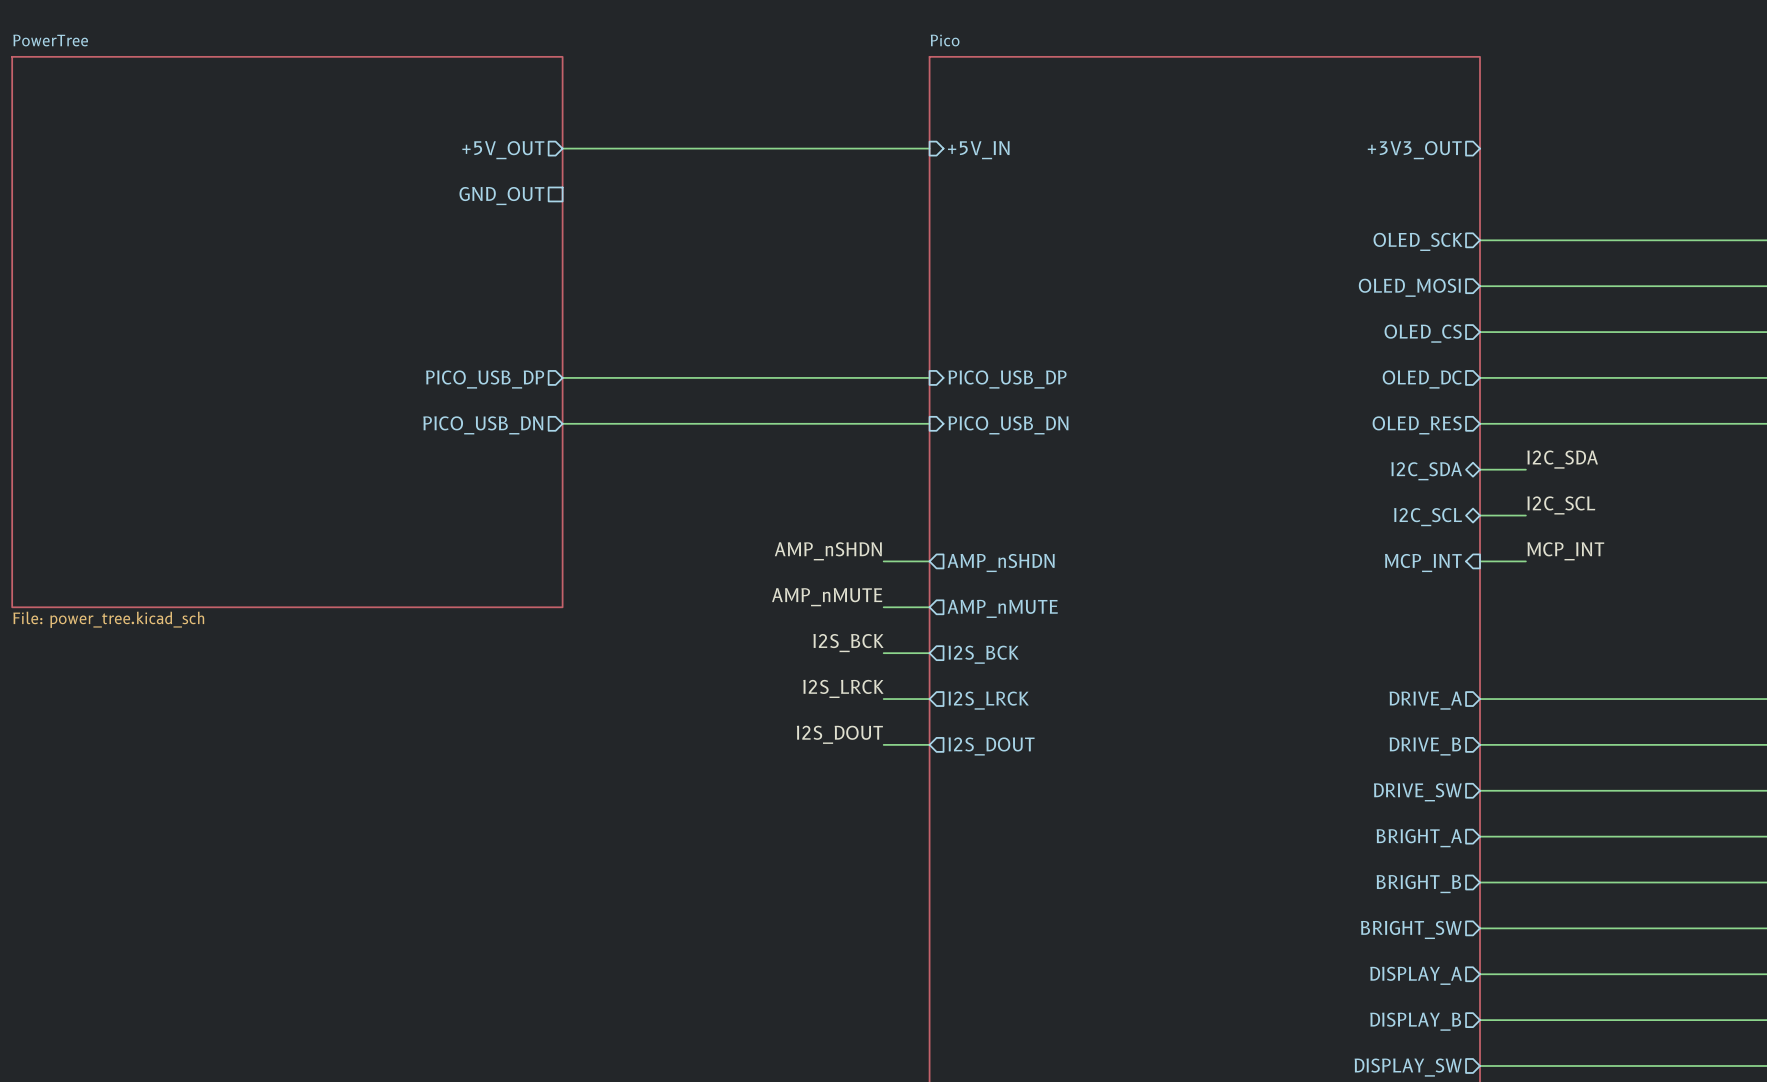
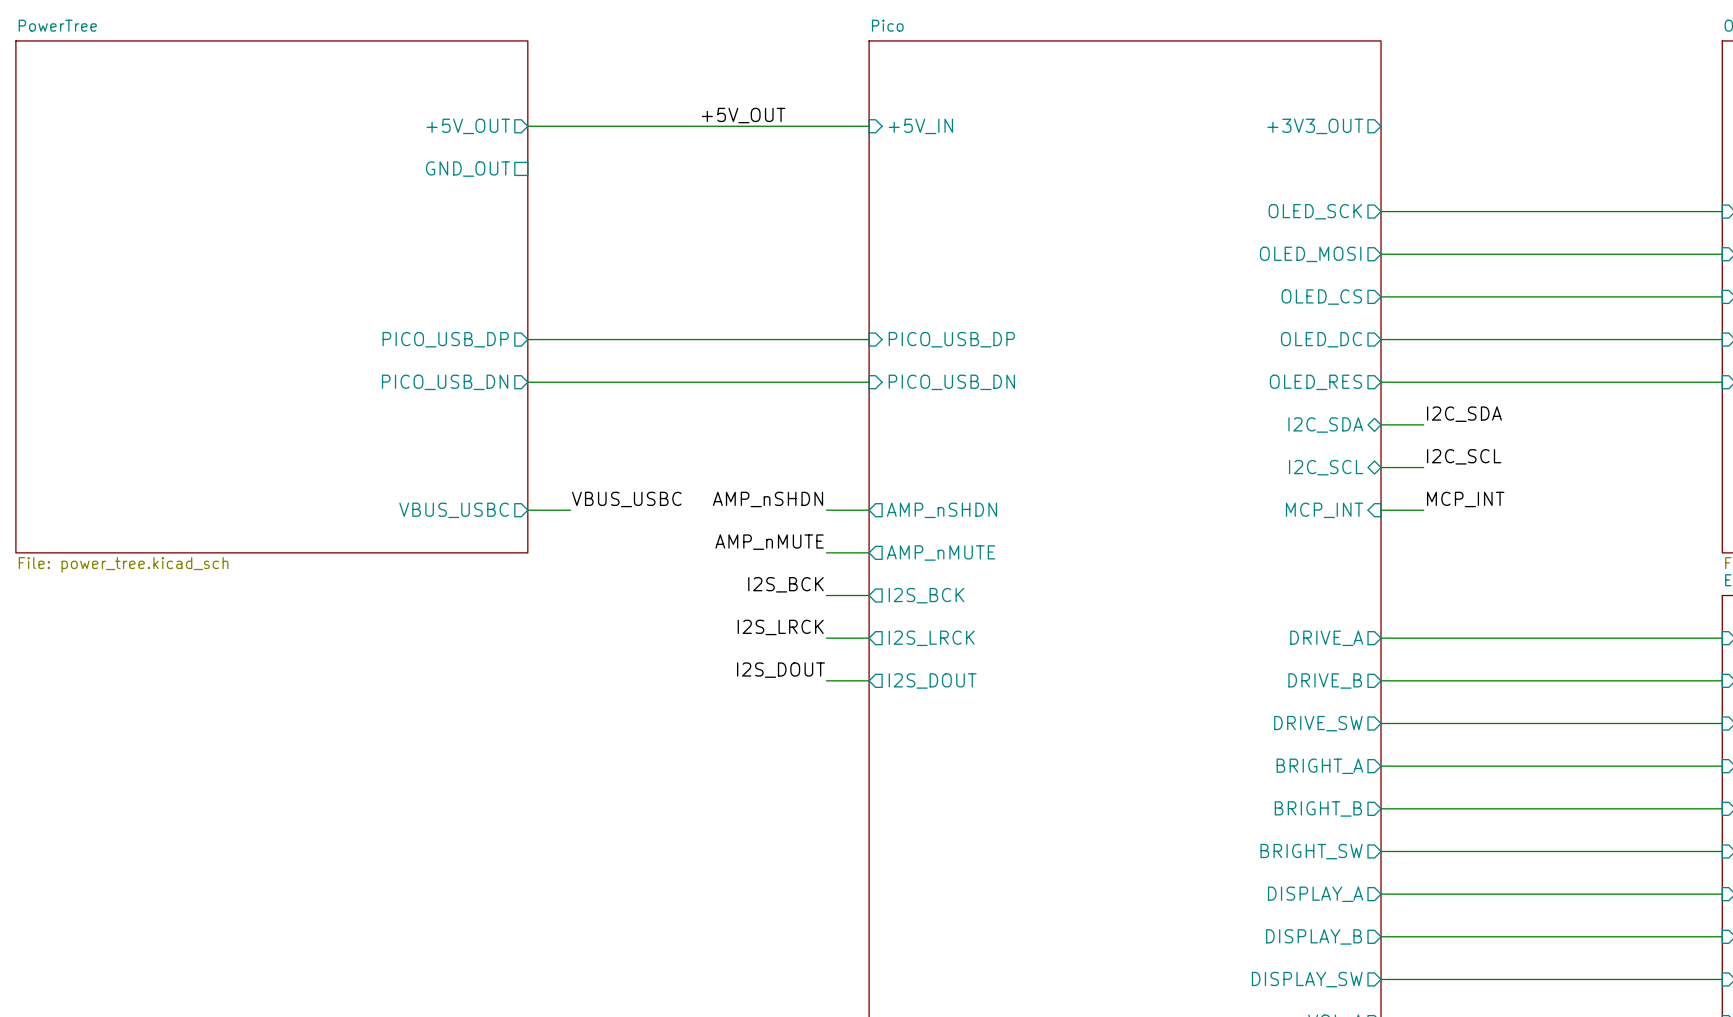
label: none -> +5V_OUT (743, 115)
label: none -> VBUS_USBC (626, 499)
wire: none -> (527, 510) (570, 510)
sheet pin: none -> VBUS_USBC (454, 510)

